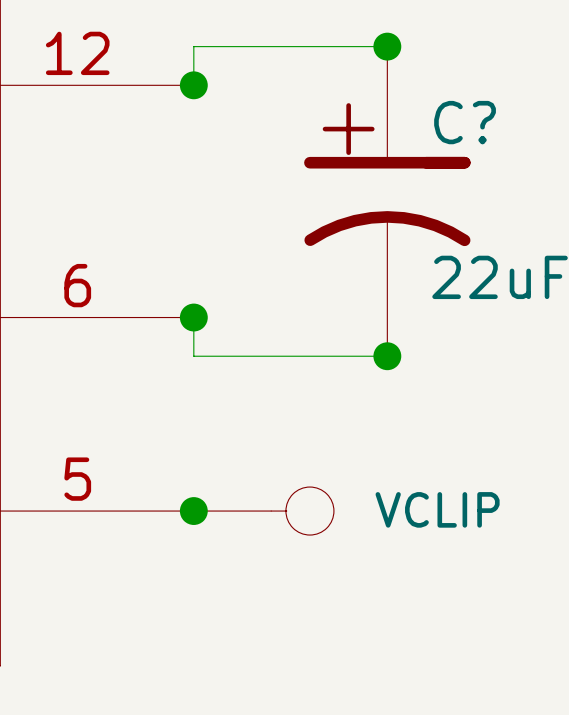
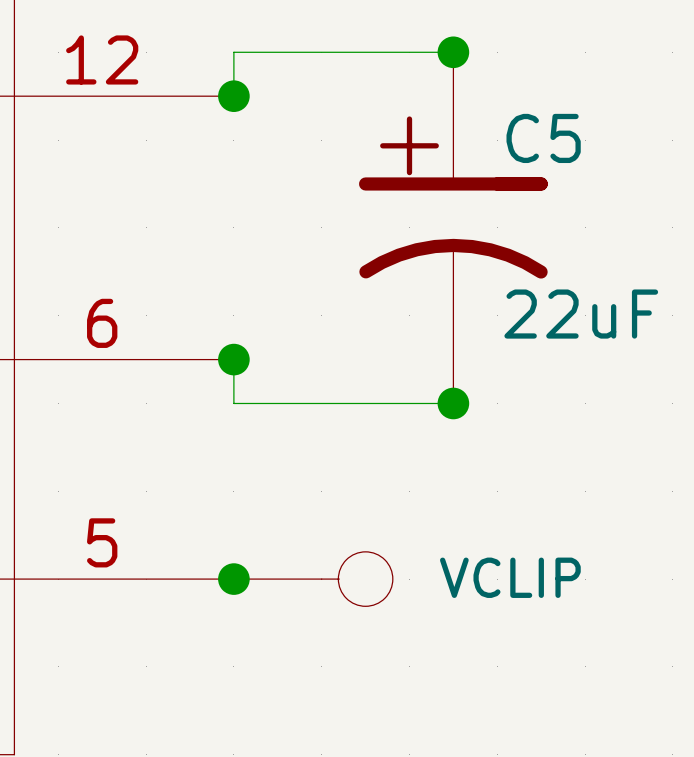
C? name: C? (465, 122) -> C5 (543, 138)

